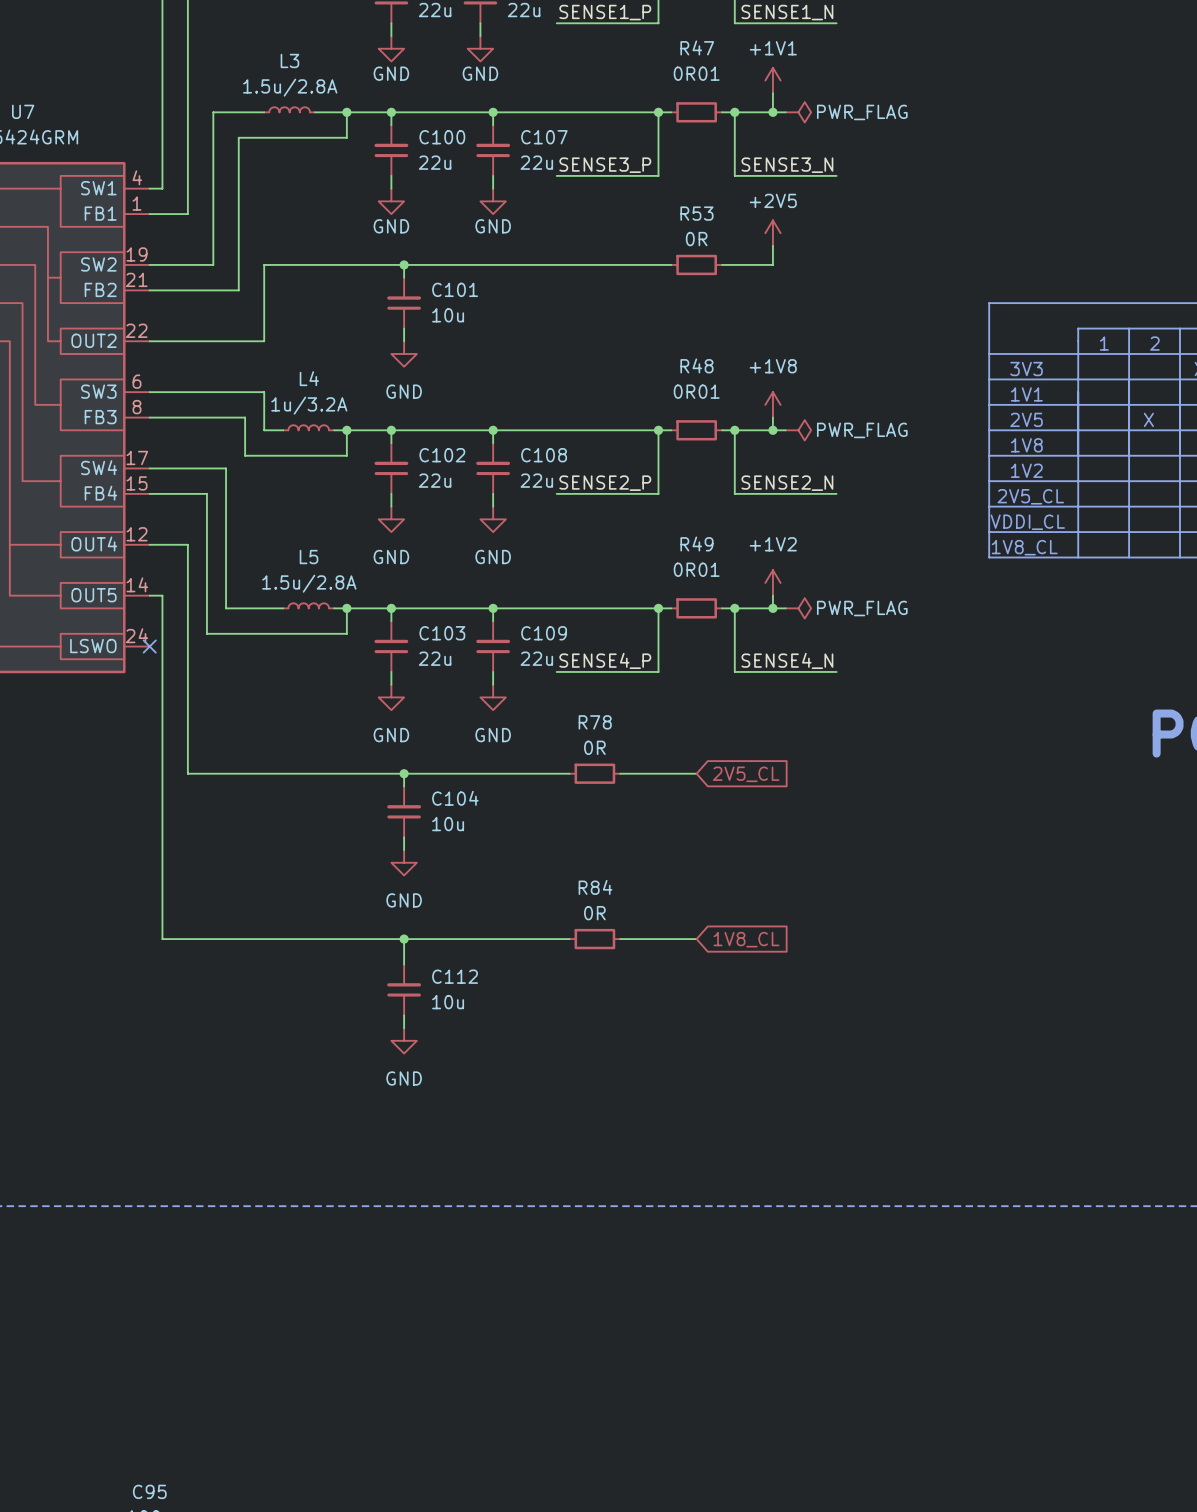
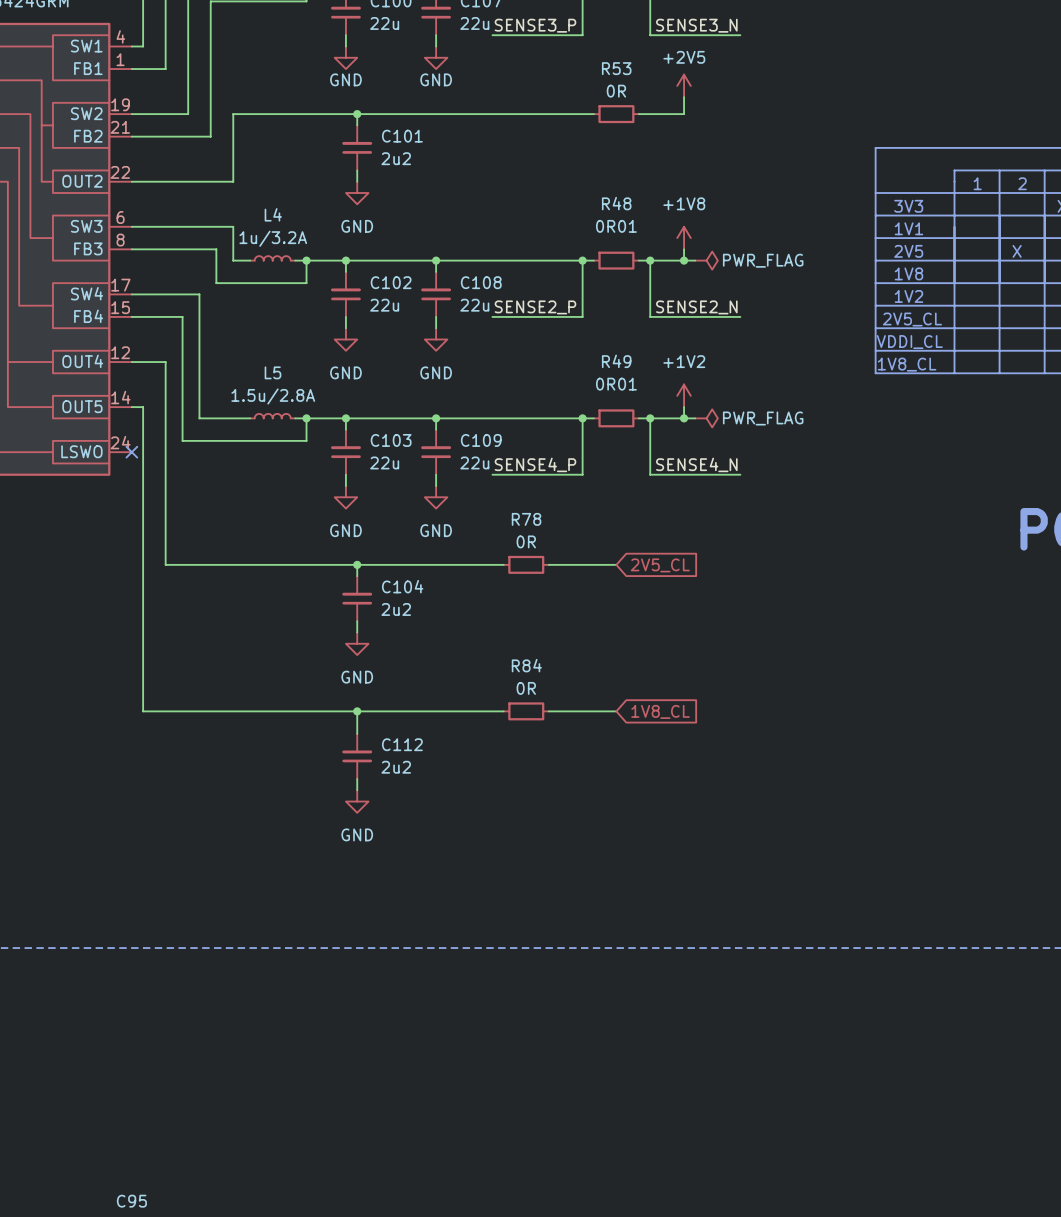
C101 text: 10u (448, 315) -> 2u2 (396, 158)
C104 text: 10u (448, 824) -> 2u2 (396, 609)
C112 text: 10u (448, 1002) -> 2u2 (396, 767)

